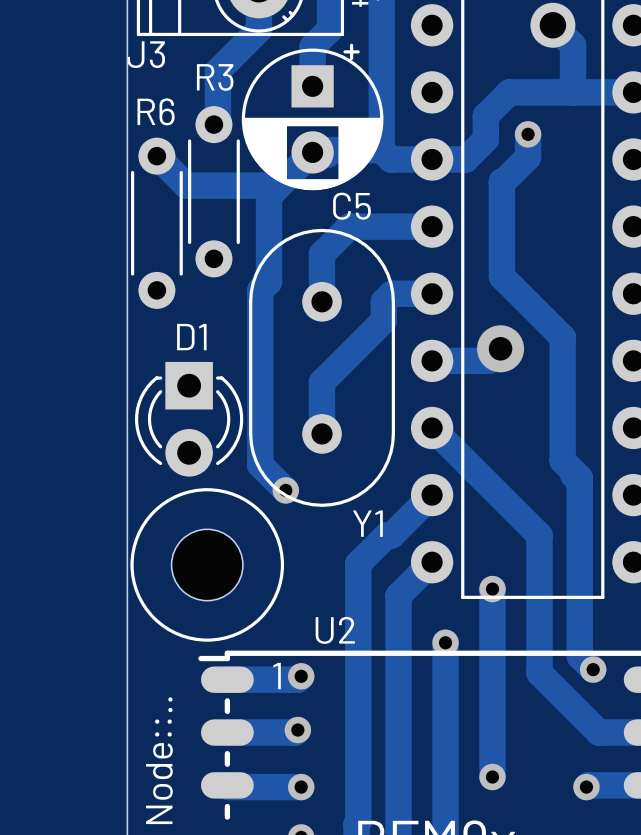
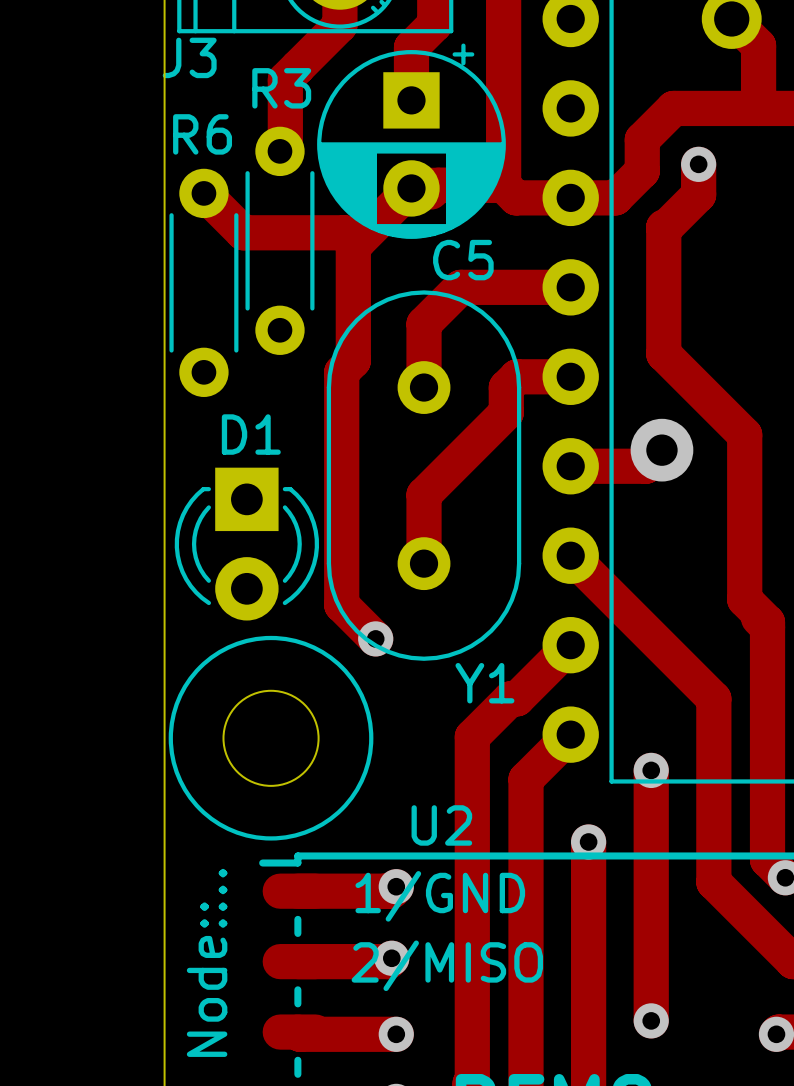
text: 1 (277, 676) -> none
text: none -> 1/GND (440, 896)
text: none -> 2/MISO (447, 965)

